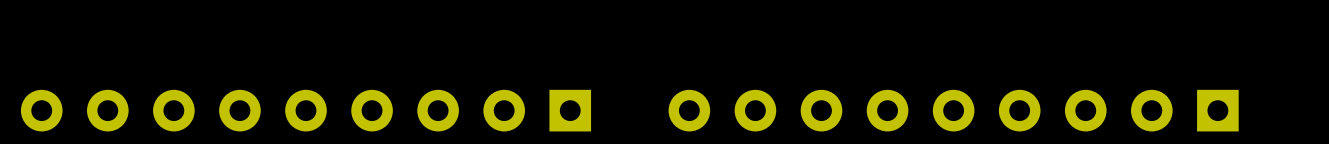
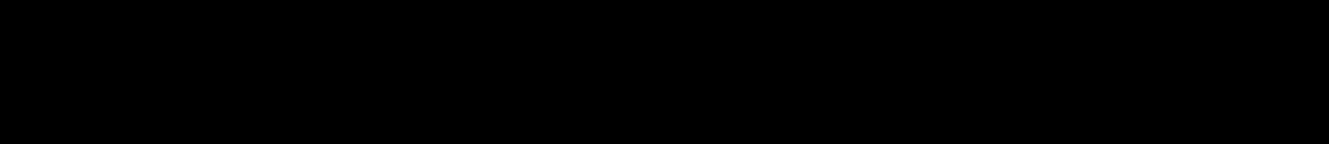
part: (306, 110) -> none
part: (953, 110) -> none

